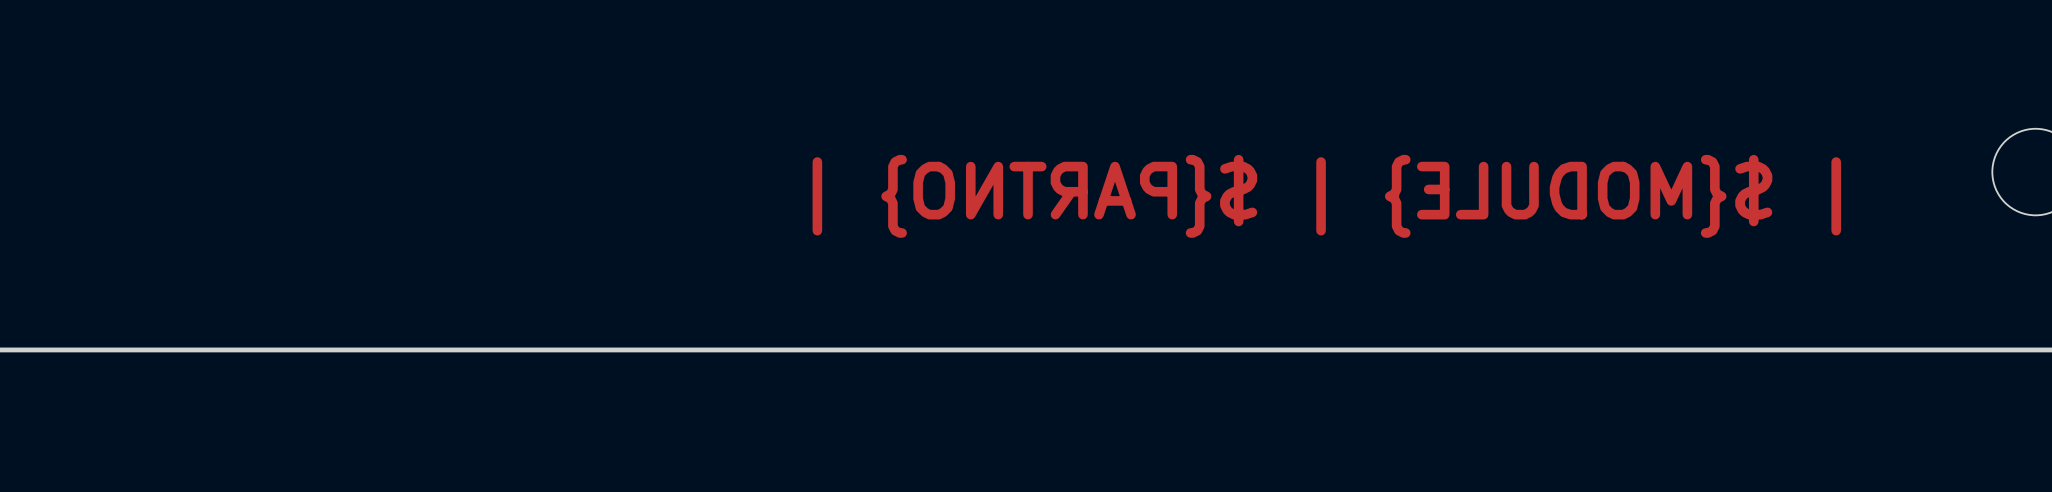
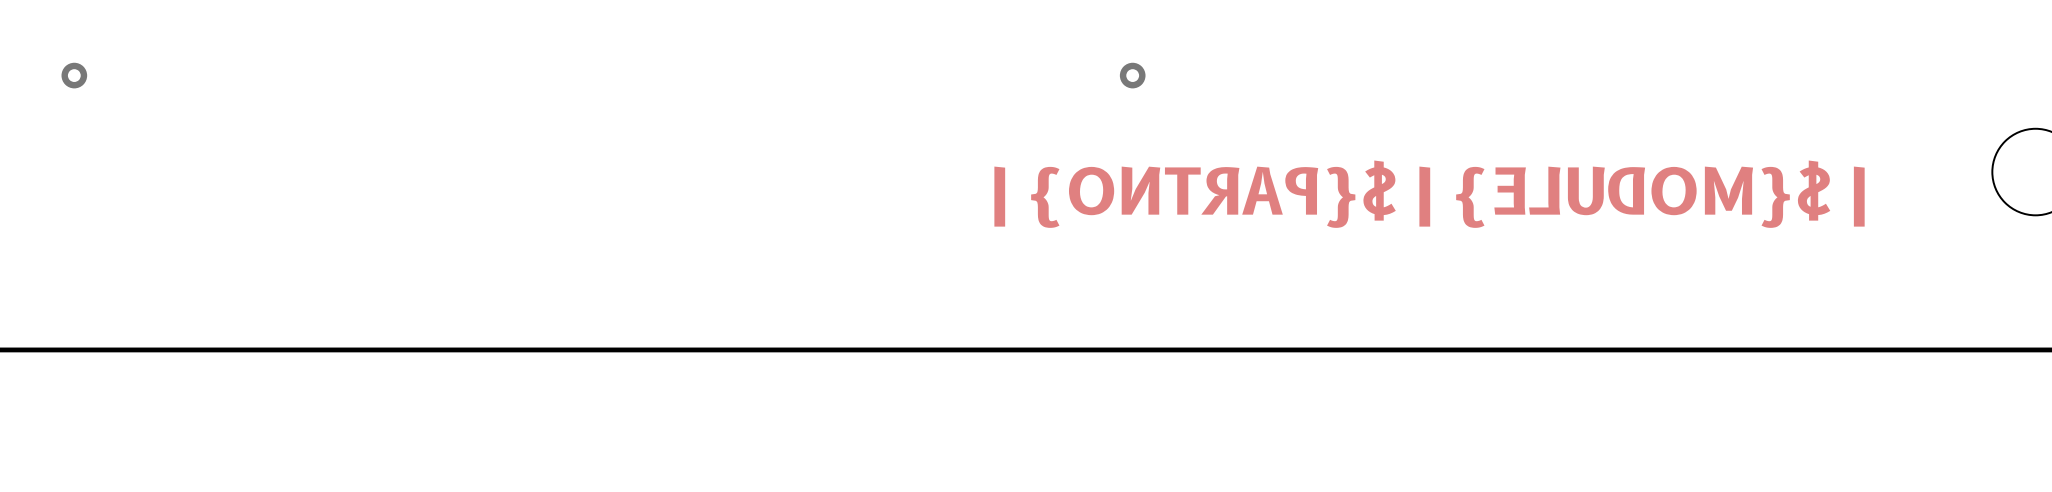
via: none -> (74, 75)
via: none -> (1132, 75)

